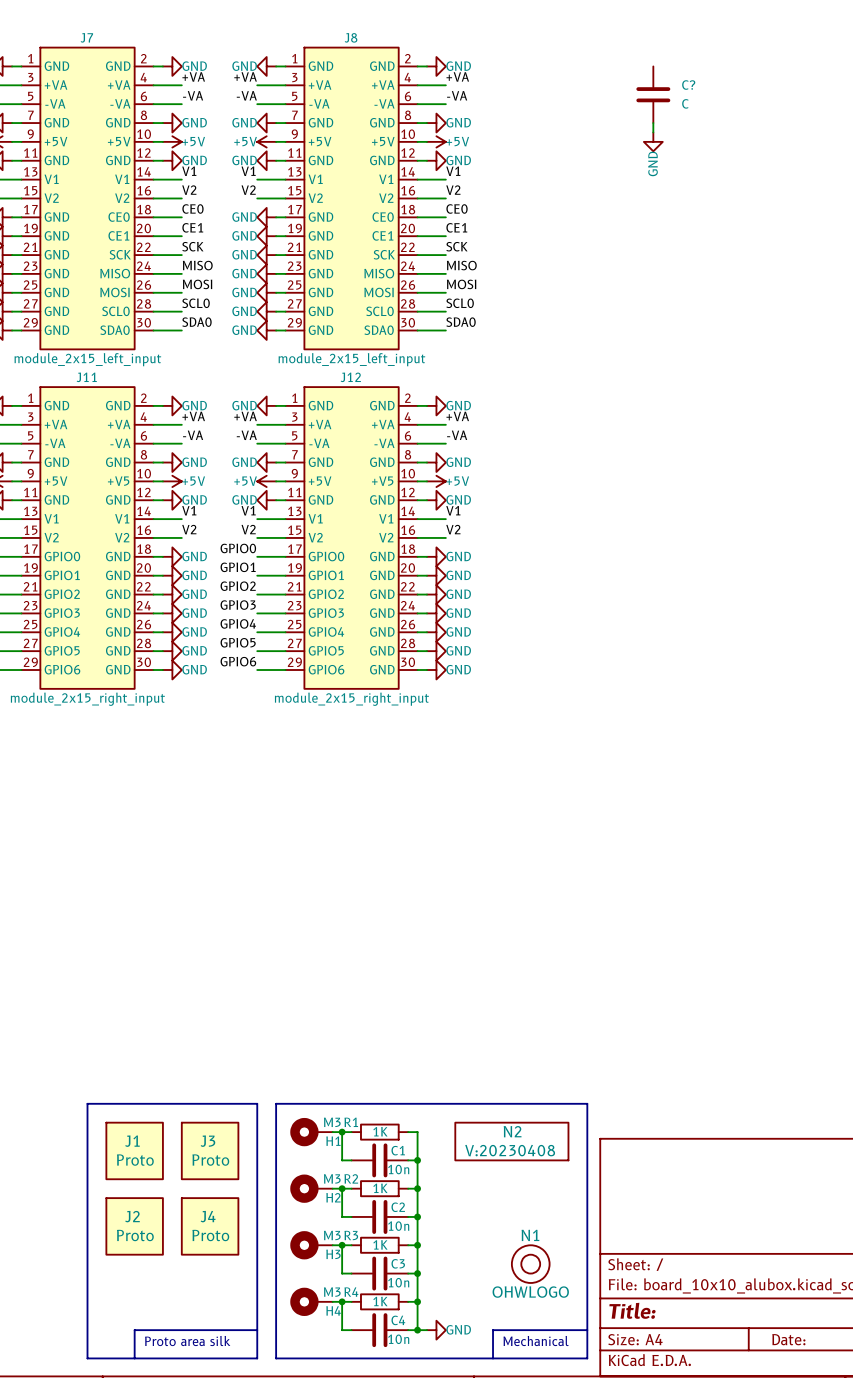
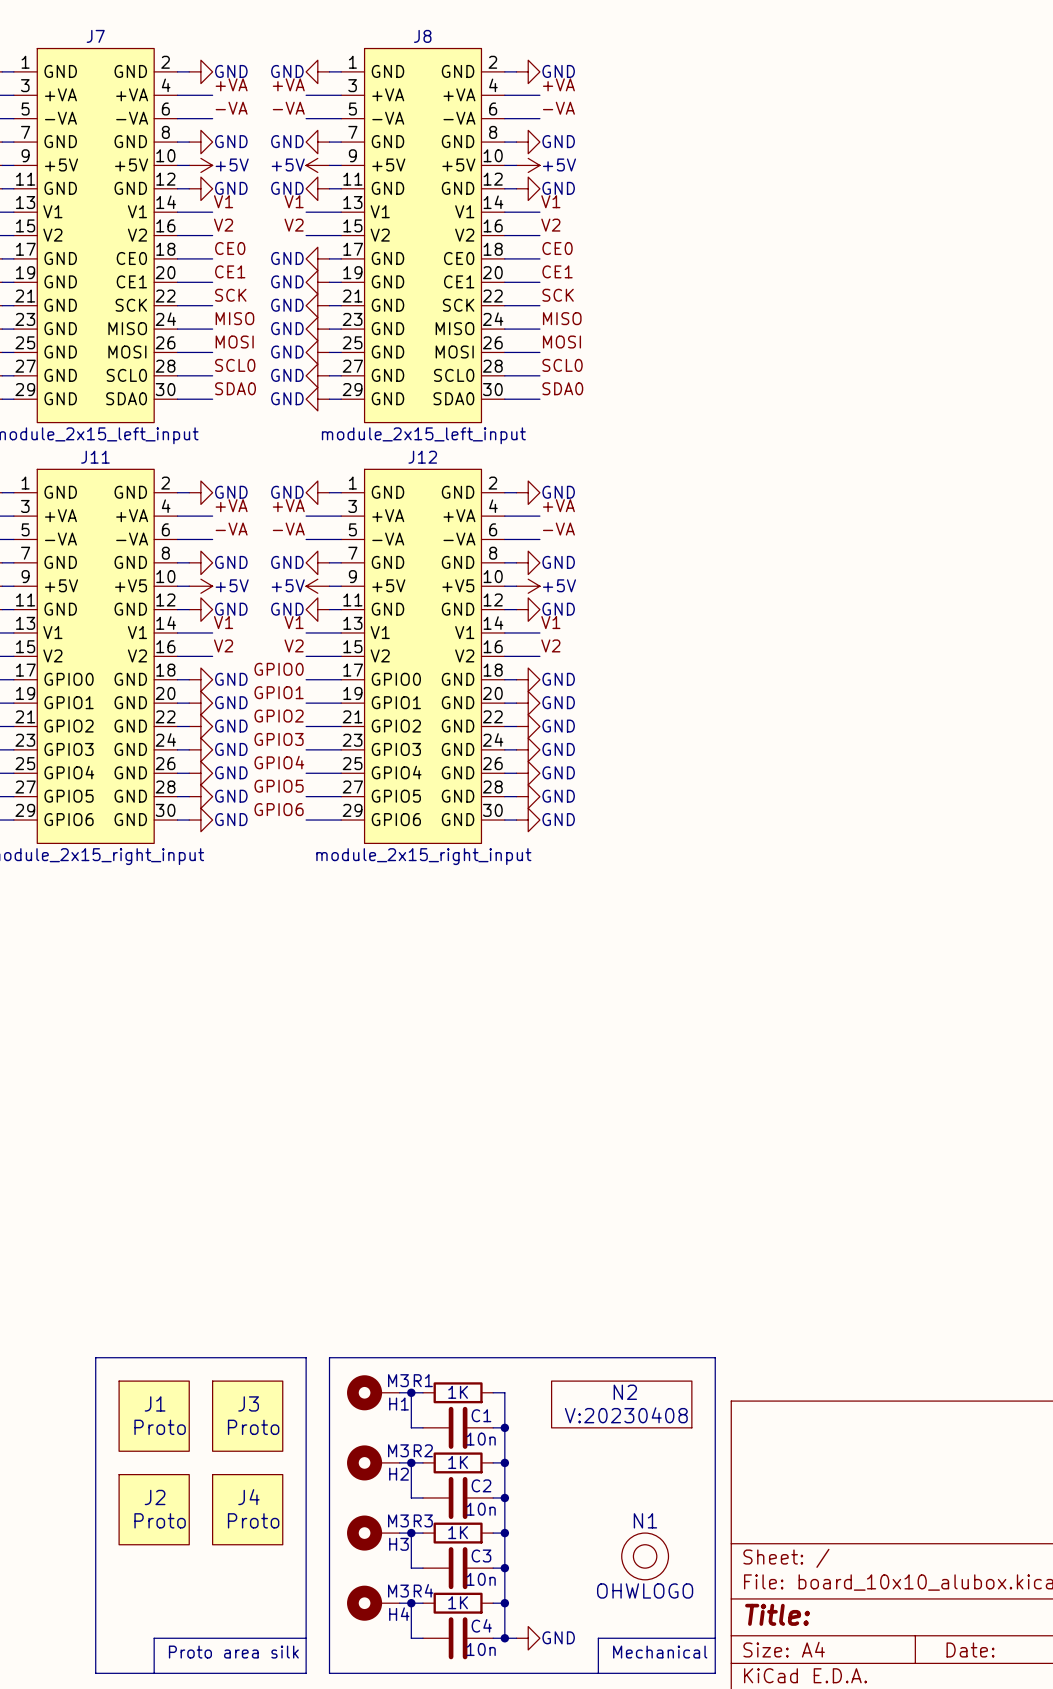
C?: C (653, 94) -> none
wire: (653, 123) (653, 132) -> none
power symbol: GND (653, 141) -> none

